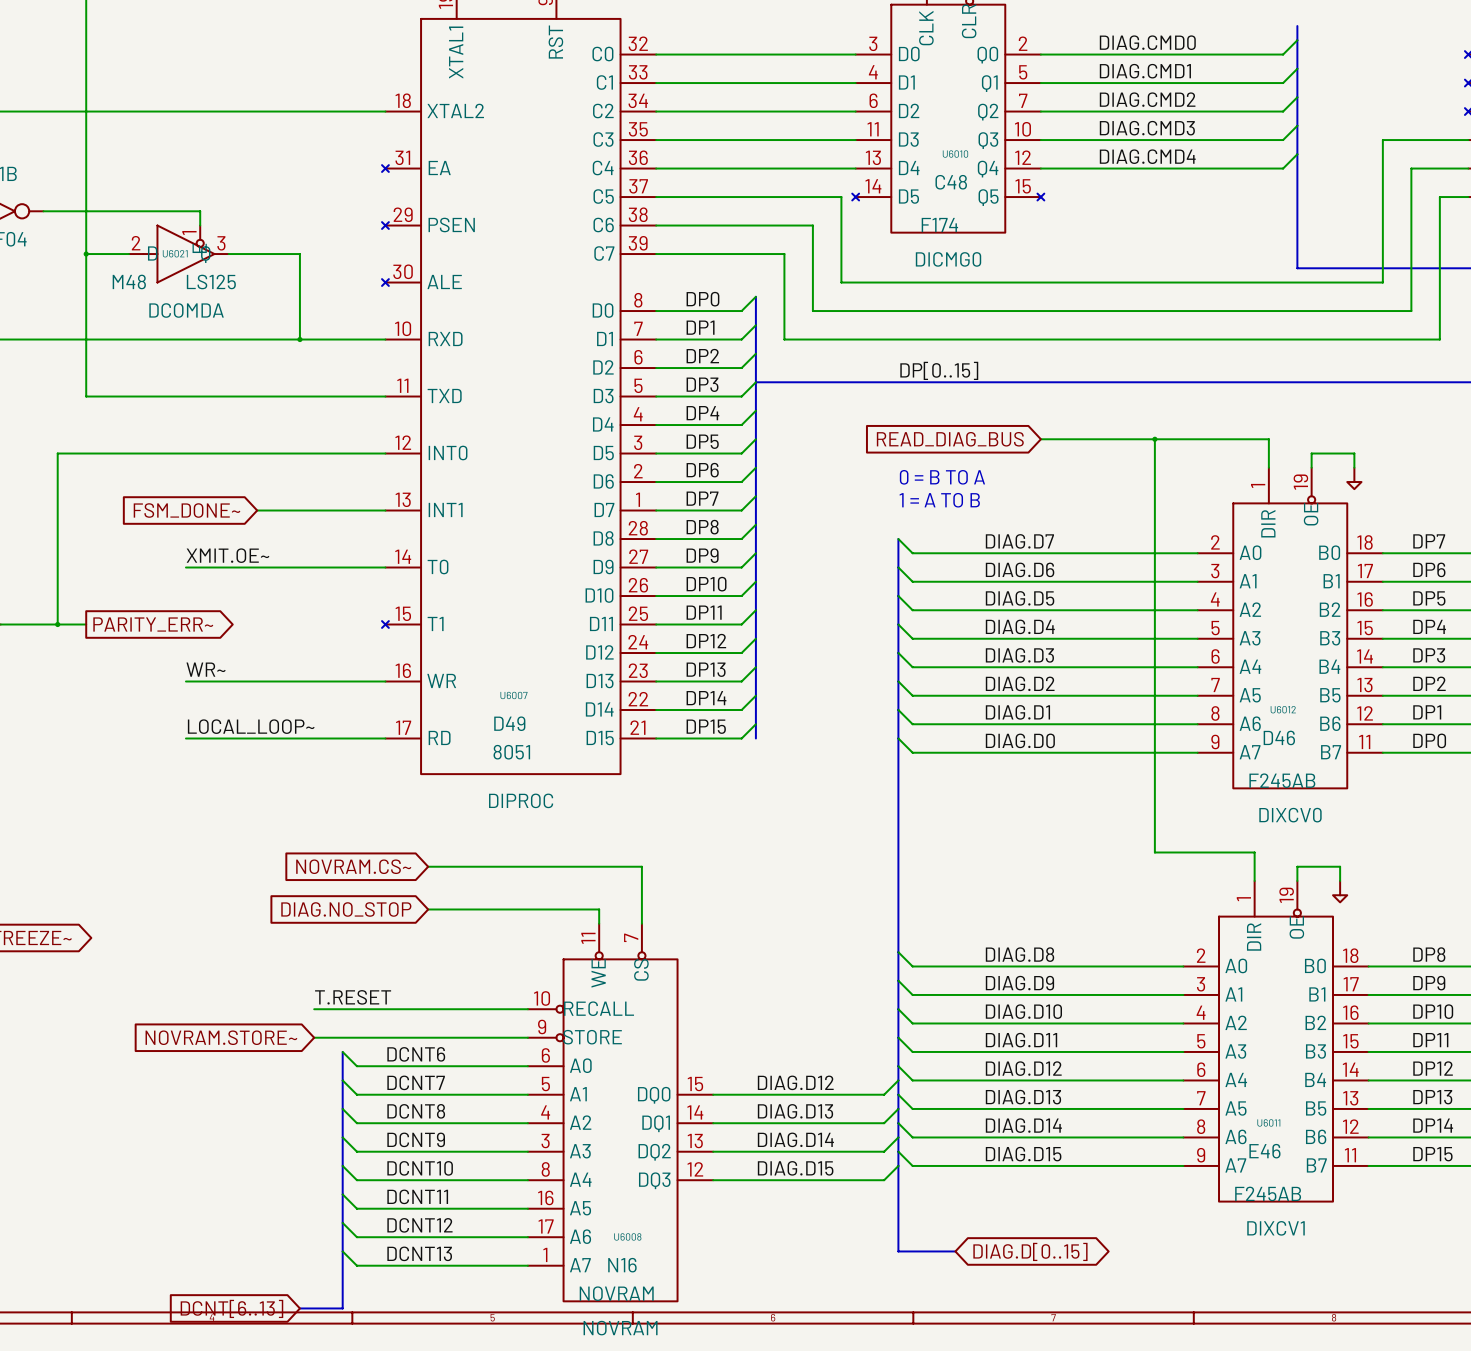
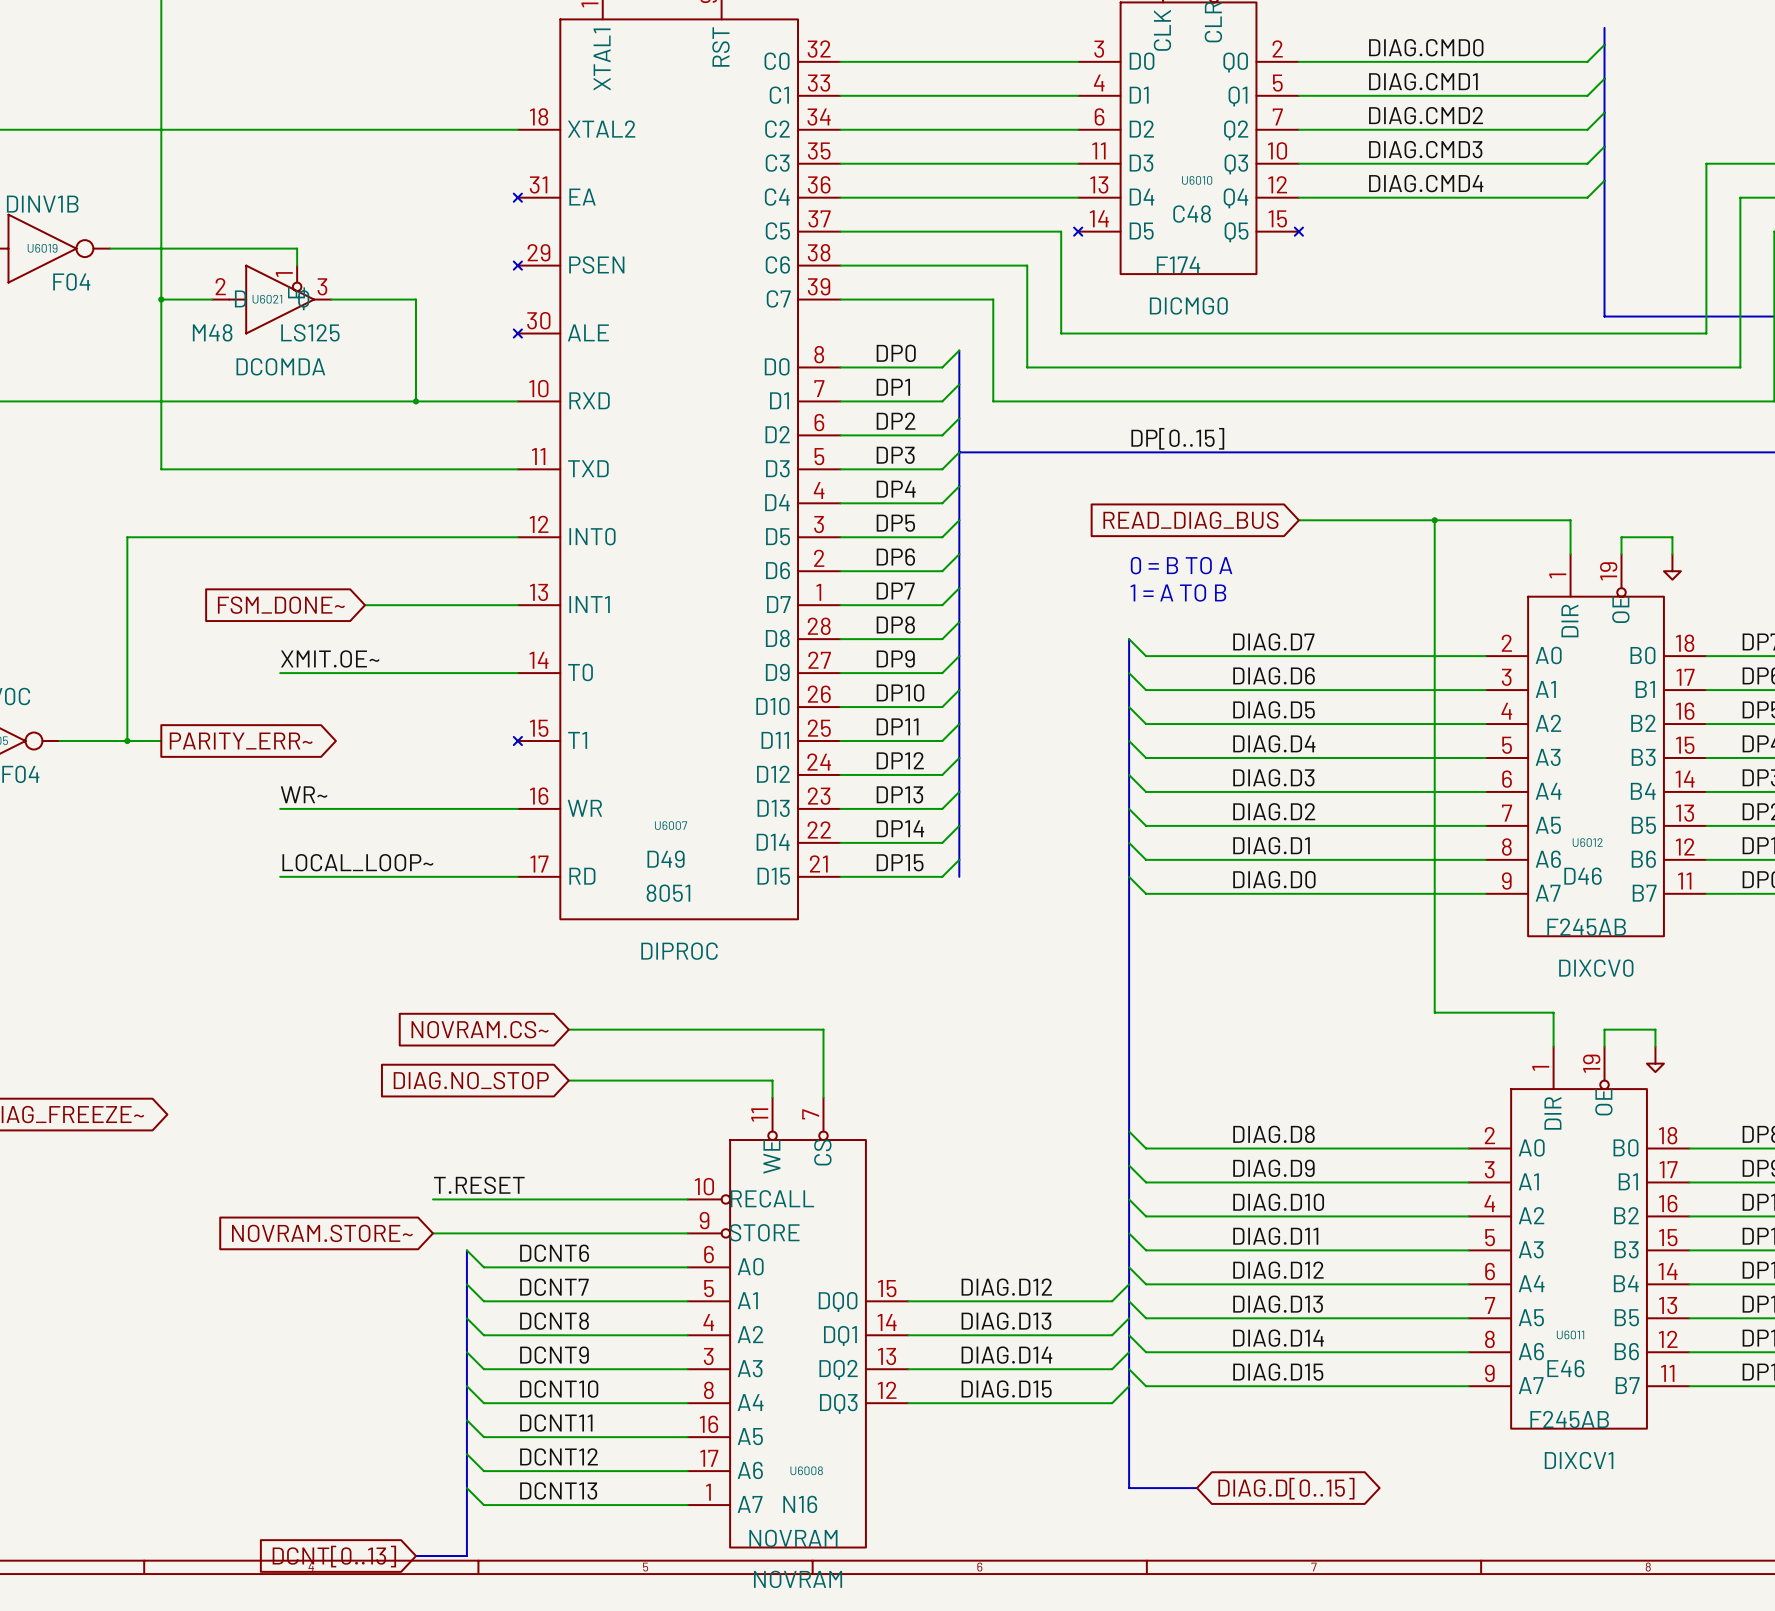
global label: DCNT[6..13] (231, 1308) -> DCNT[0..13] (334, 1556)

